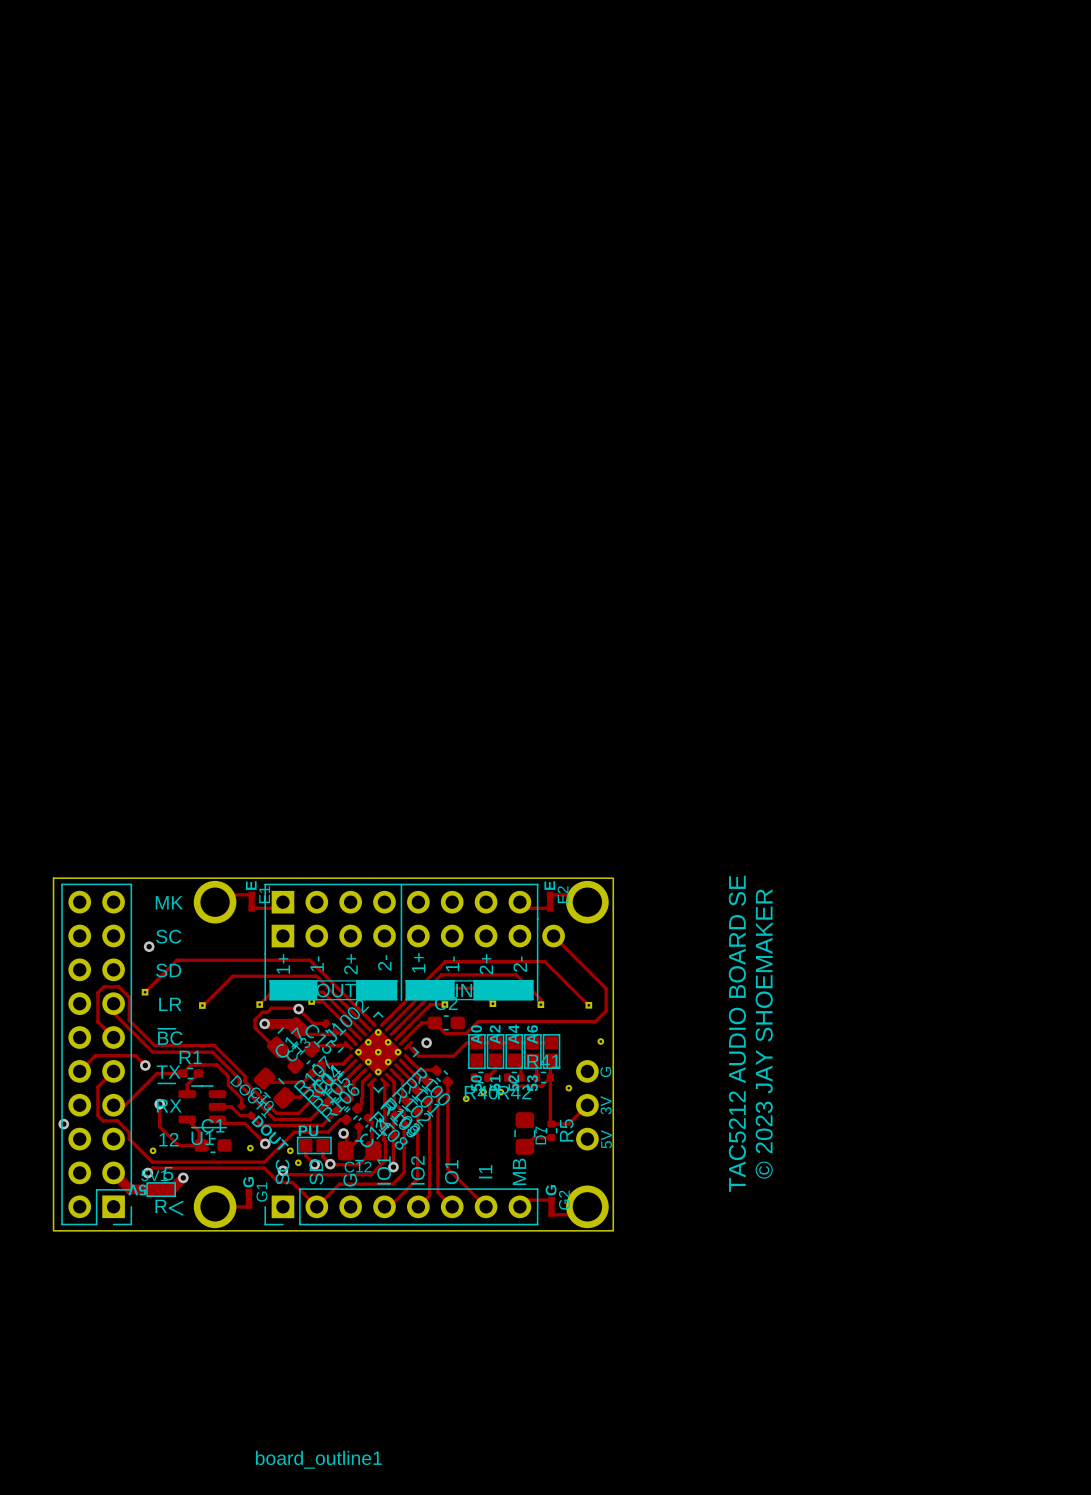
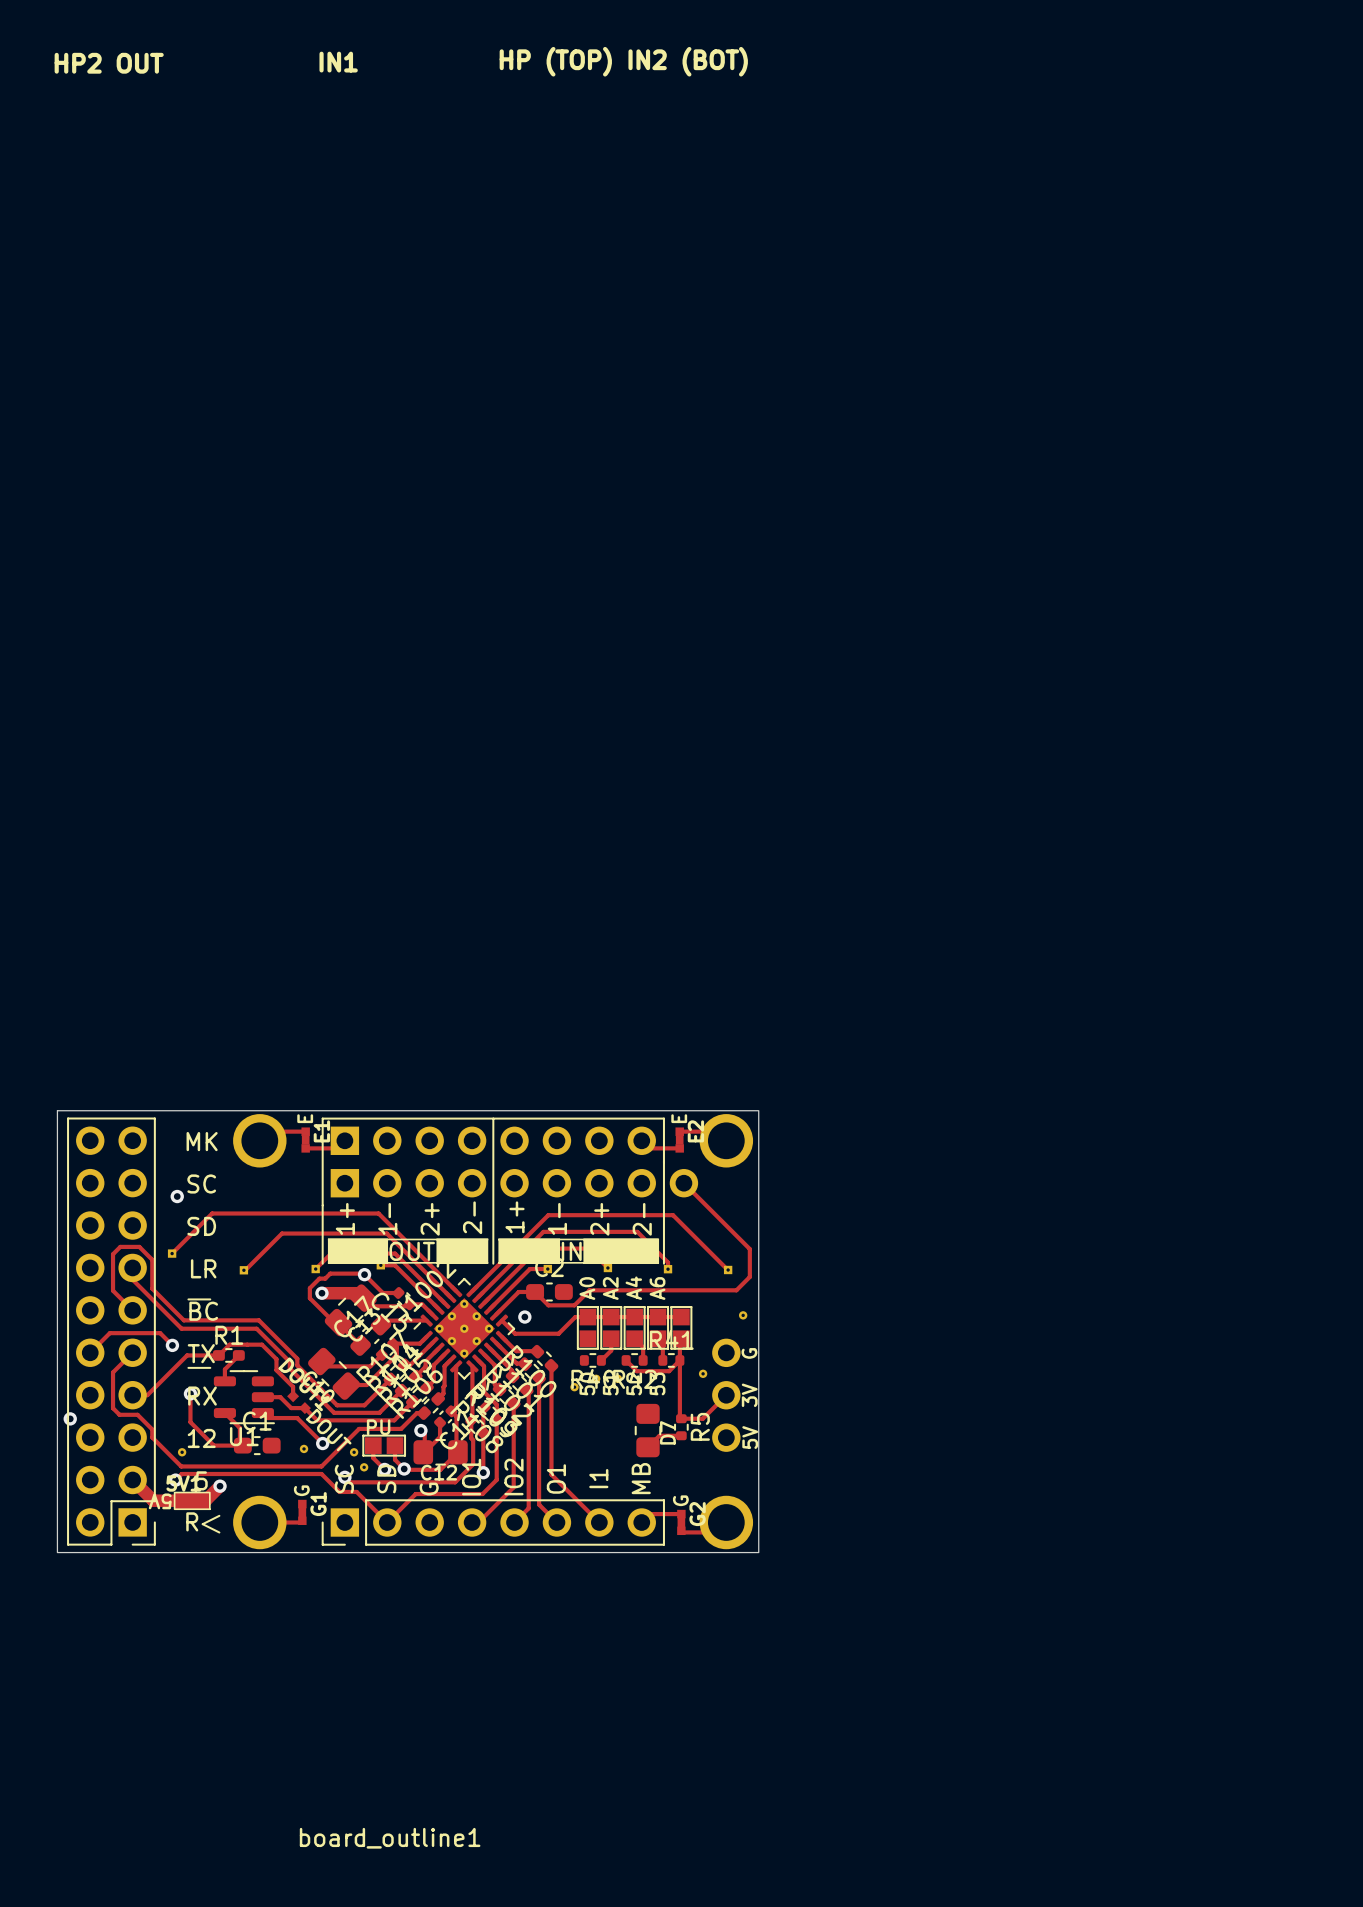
text: none -> IN1 (338, 62)
text: none -> HP (TOP) IN2 (BOT) (623, 61)
text: none -> HP2 OUT (109, 63)
text: TAC5212 AUDIO BOARD SE (737, 1033) -> none
text: © 2023 JAY SHOEMAKER (764, 1033) -> none

